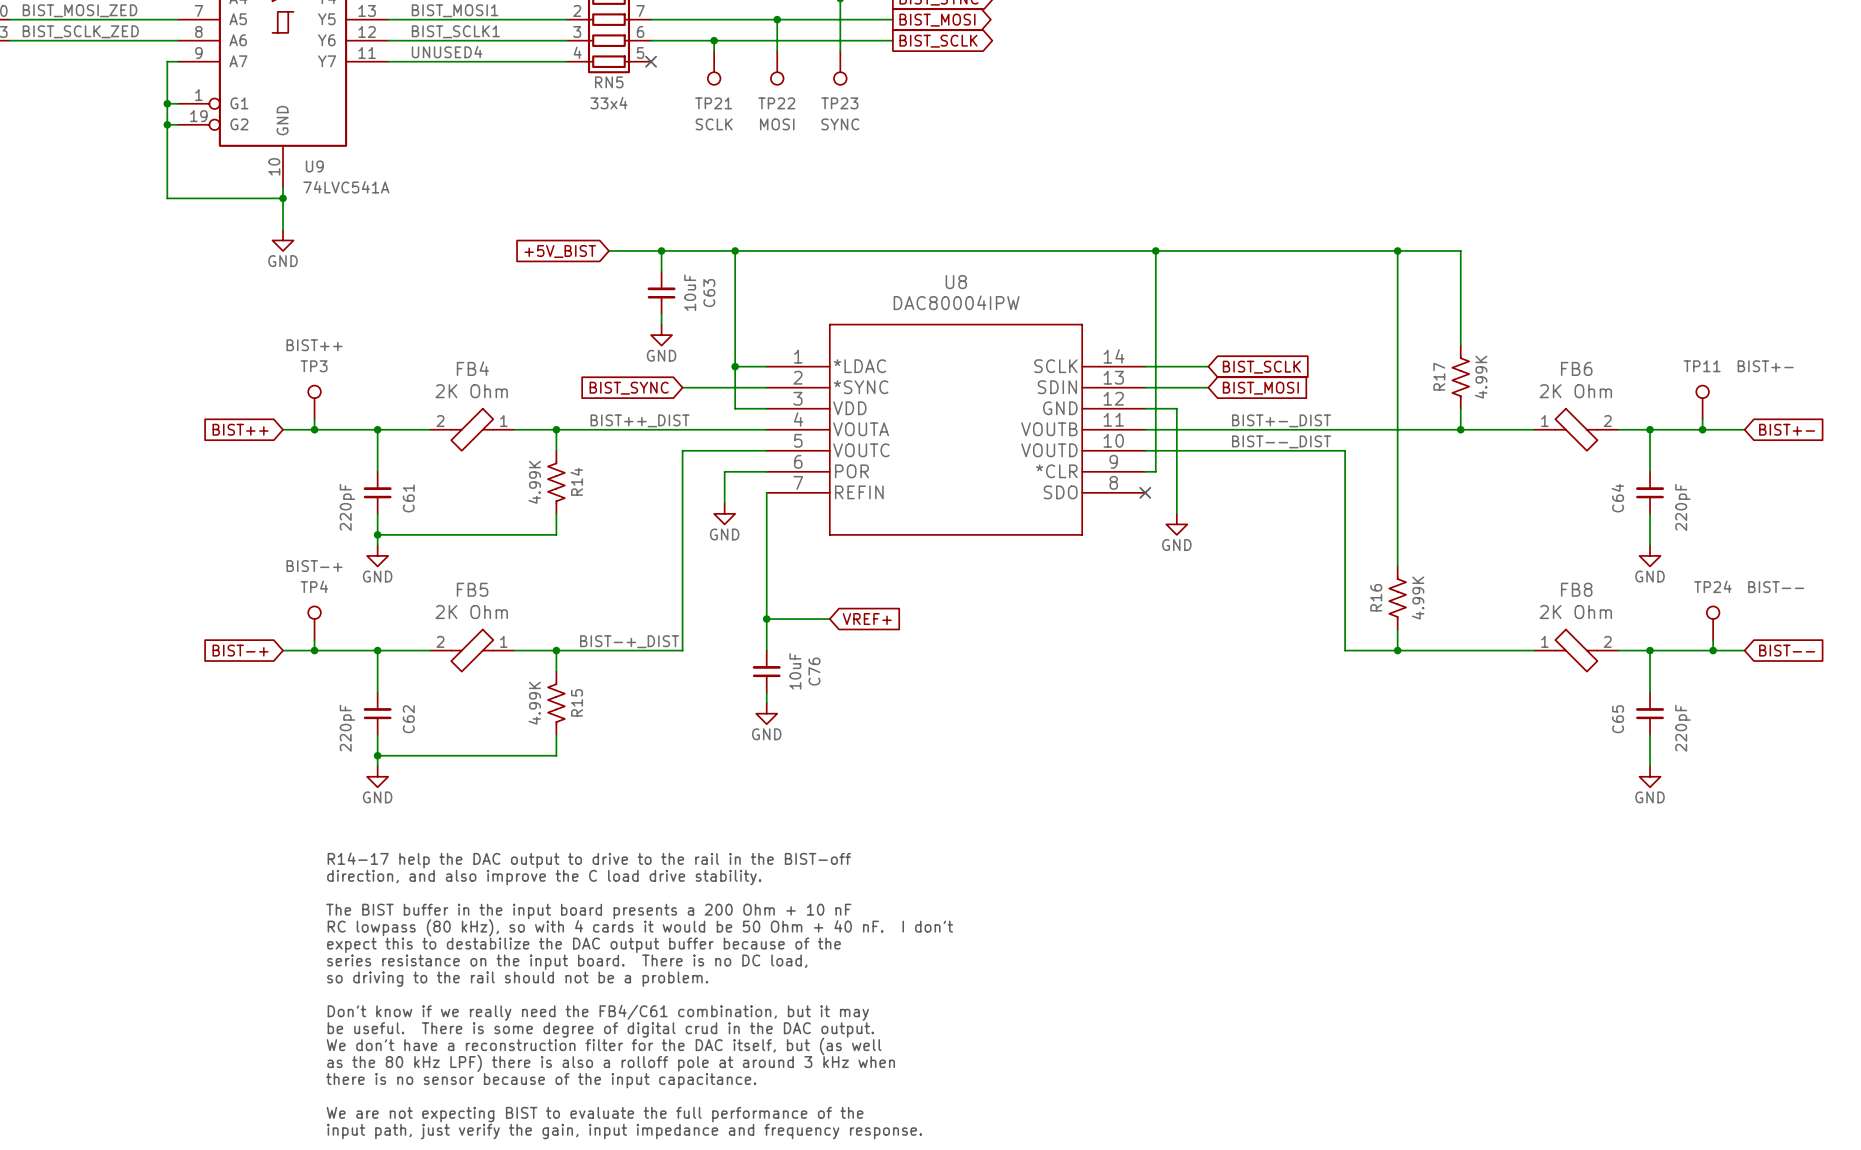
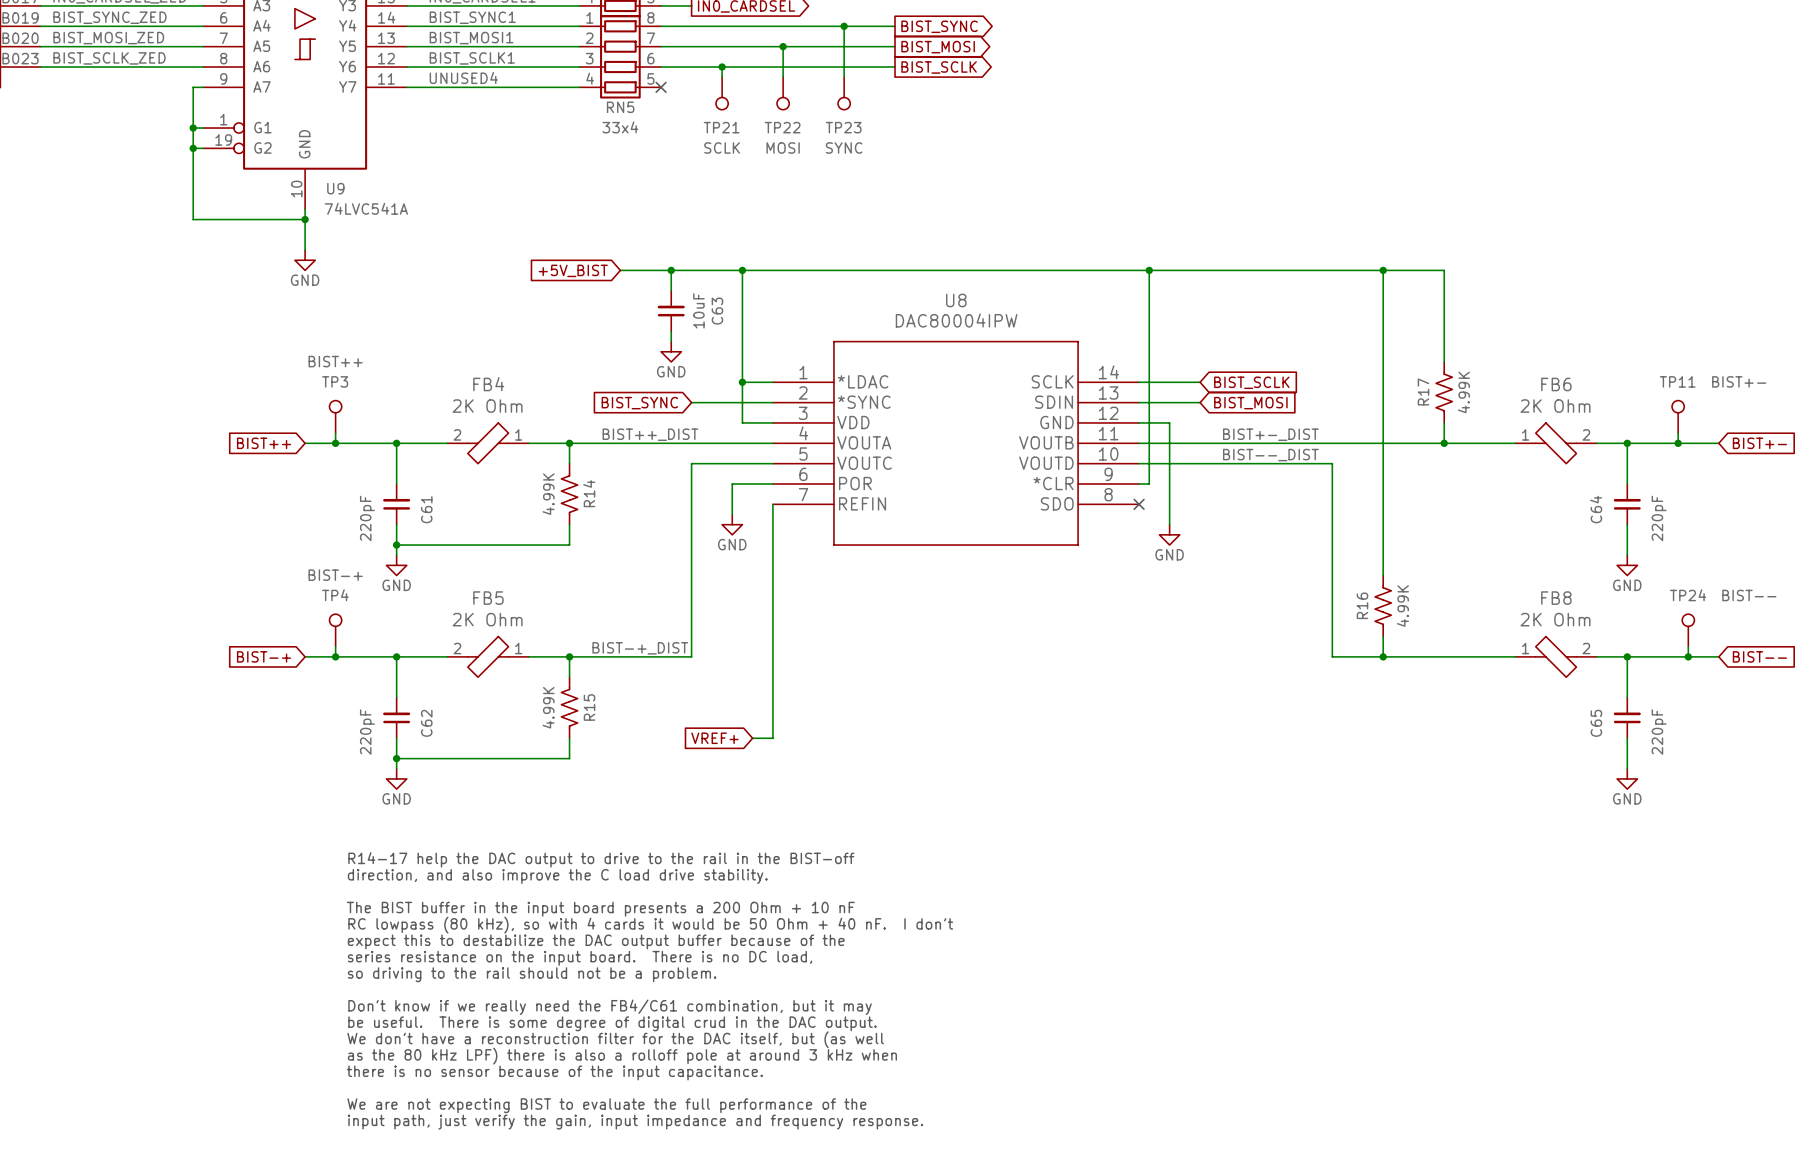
wire: (766, 619) (829, 619) -> none
junction: (766, 619) -> none
global label rotation: 0° (867, 619) -> 180° (714, 738)
global label position: VREF+ (867, 619) -> VREF+ (714, 738)
C76: 10uF (766, 671) -> none
wire: none -> (772, 707) (772, 738) (752, 738)
power symbol: GND (766, 713) -> none

